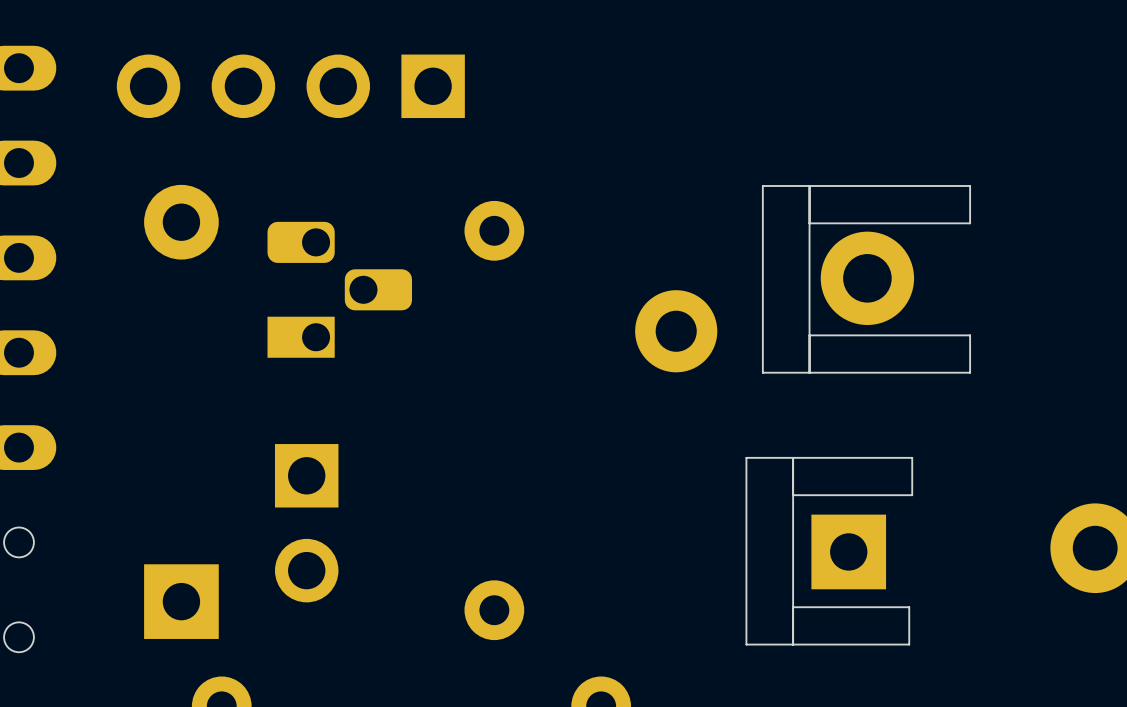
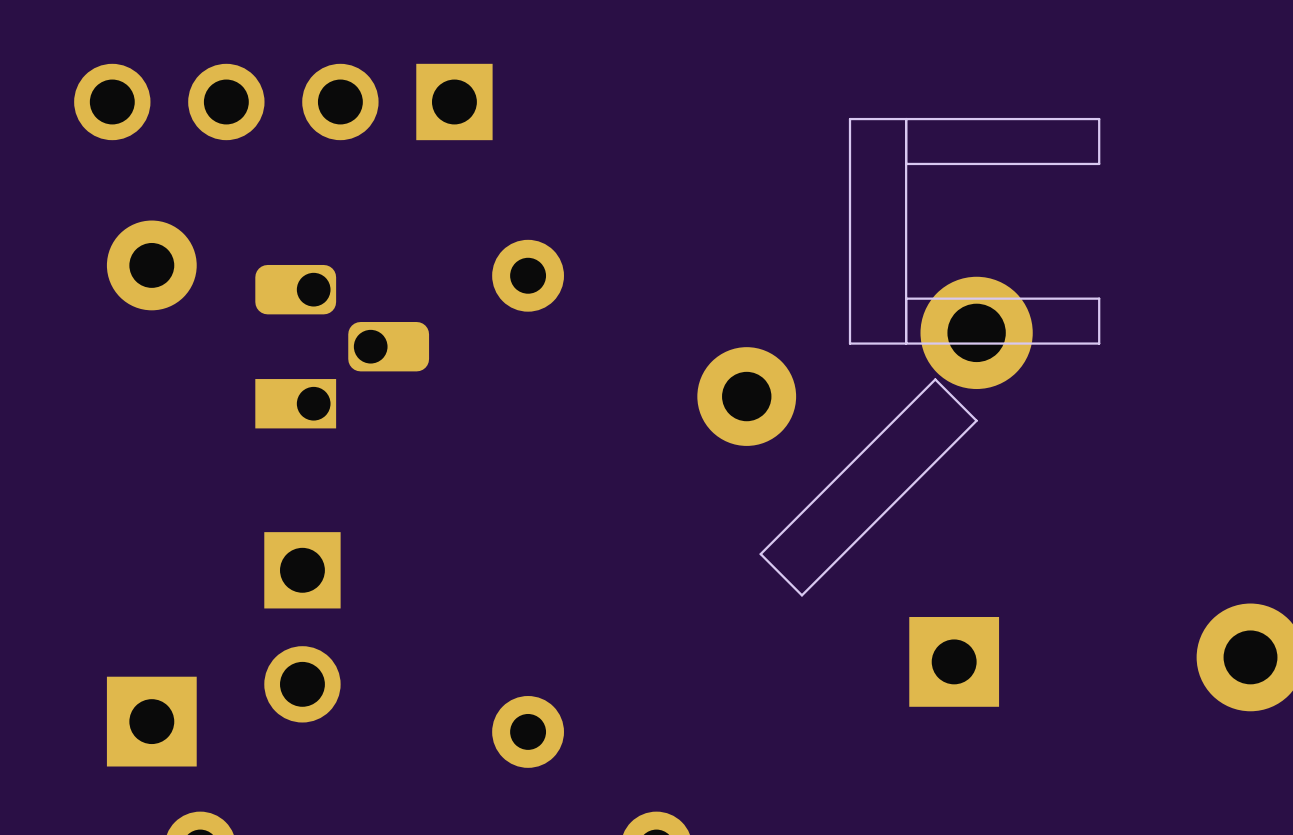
board edge: (809, 186) (809, 372) -> (906, 119) (906, 343)
board edge: (809, 223) (970, 223) (970, 186) (762, 186) (762, 372) (970, 372) (970, 335) (809, 335) -> (906, 163) (1099, 163) (1099, 119) (850, 119) (850, 343) (1099, 343) (1099, 298) (906, 298)
board edge: none -> (935, 379) (976, 420) (801, 595) (760, 554) (935, 379)
board edge: (793, 457) (793, 644) -> none
board edge: (793, 495) (912, 495) (912, 457) (746, 457) (746, 644) (909, 644) (909, 607) (793, 607) -> none

